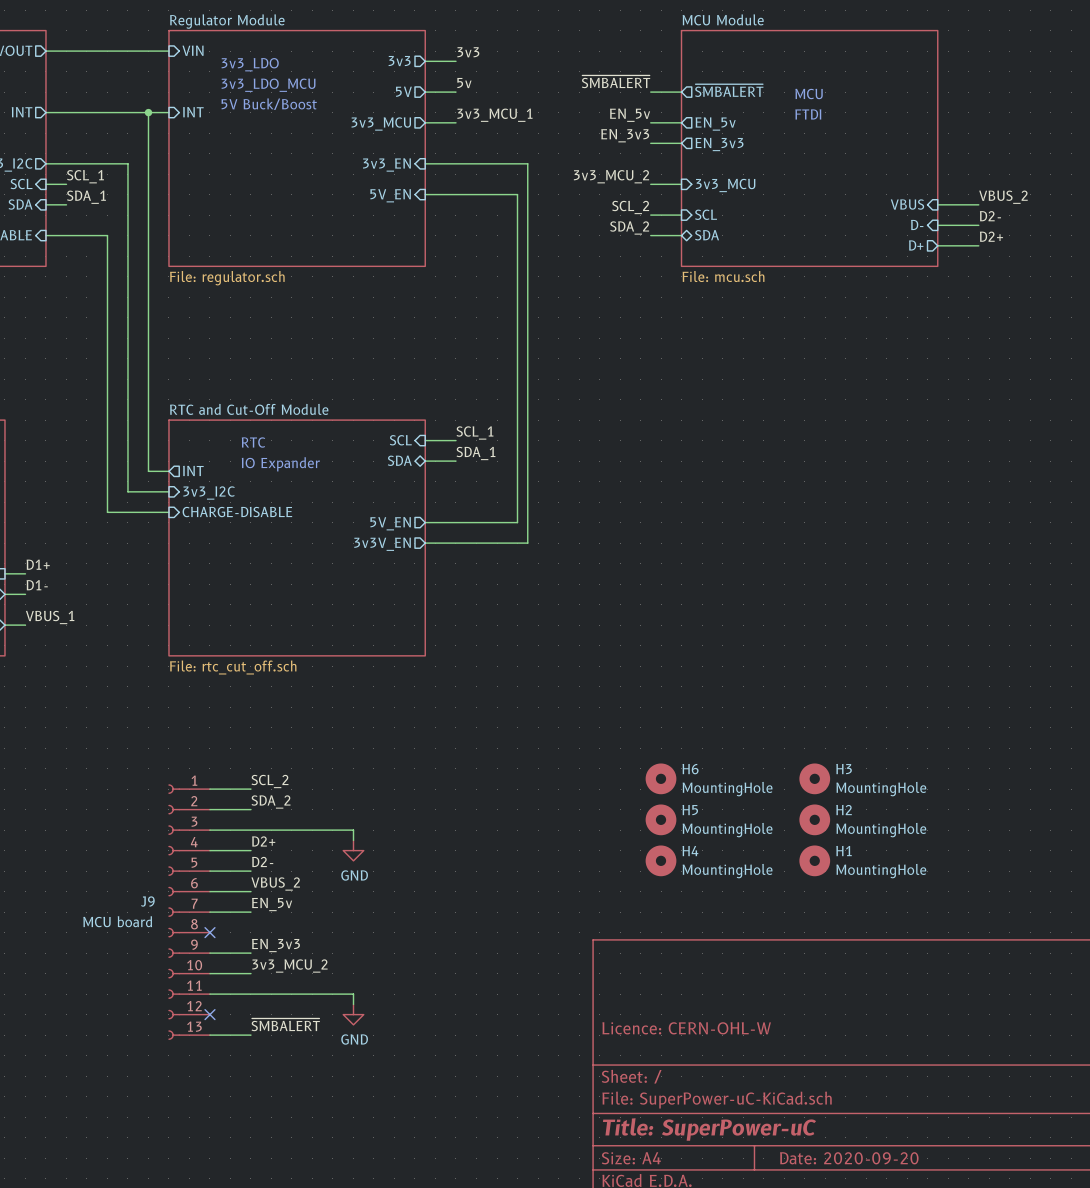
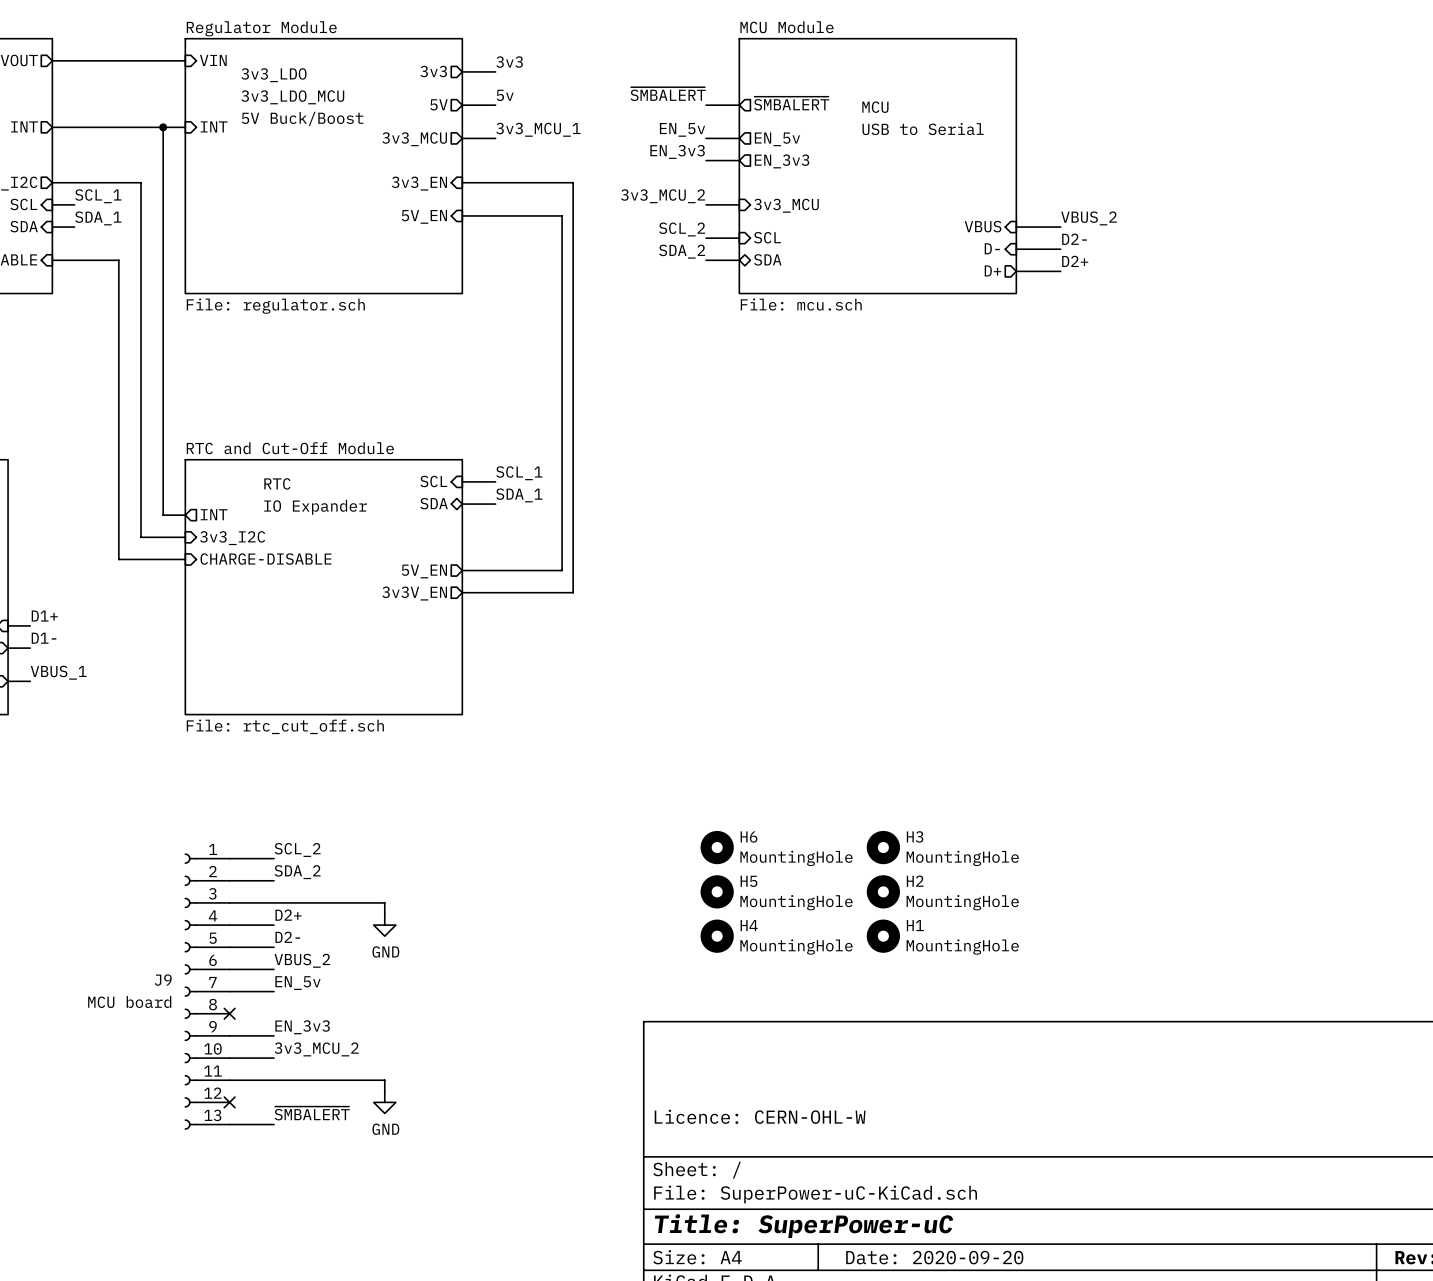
text: FTDI (808, 114) -> USB to Serial (923, 129)

